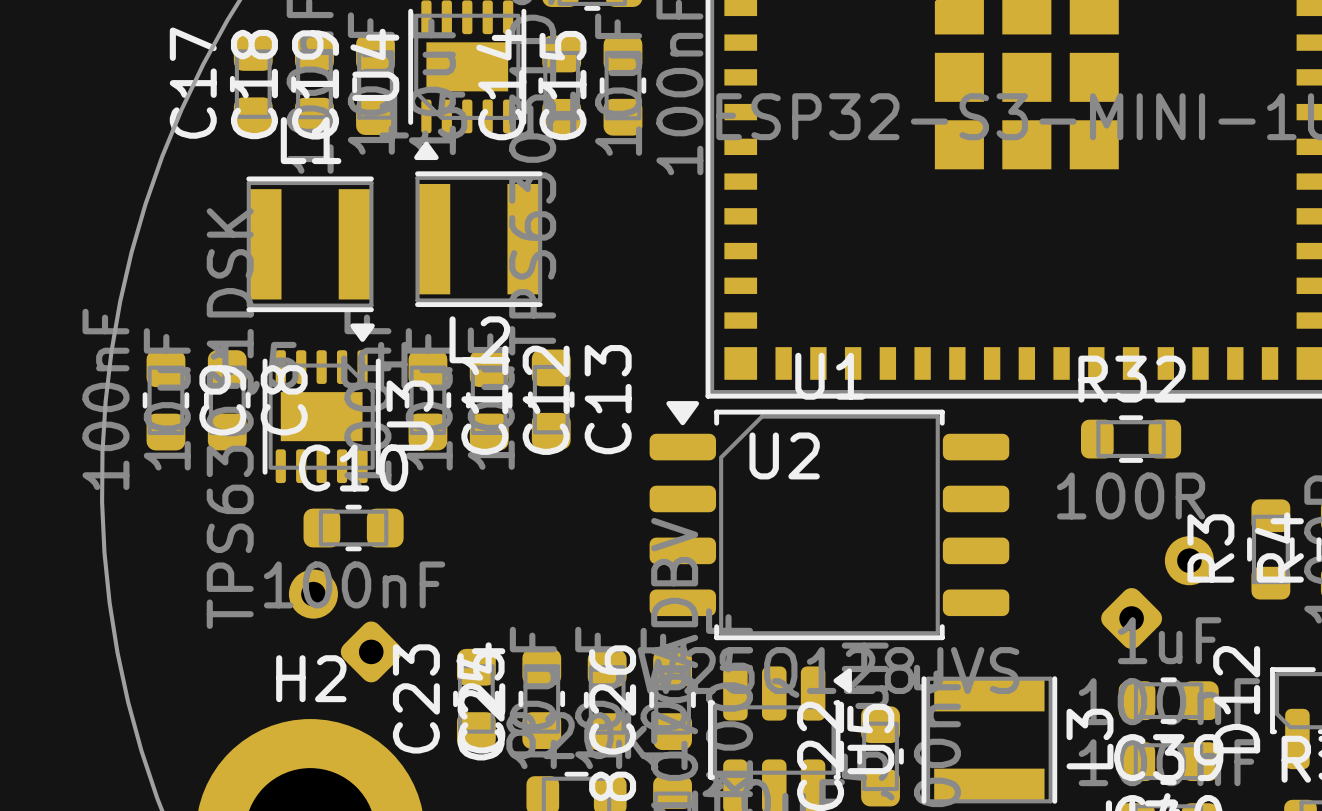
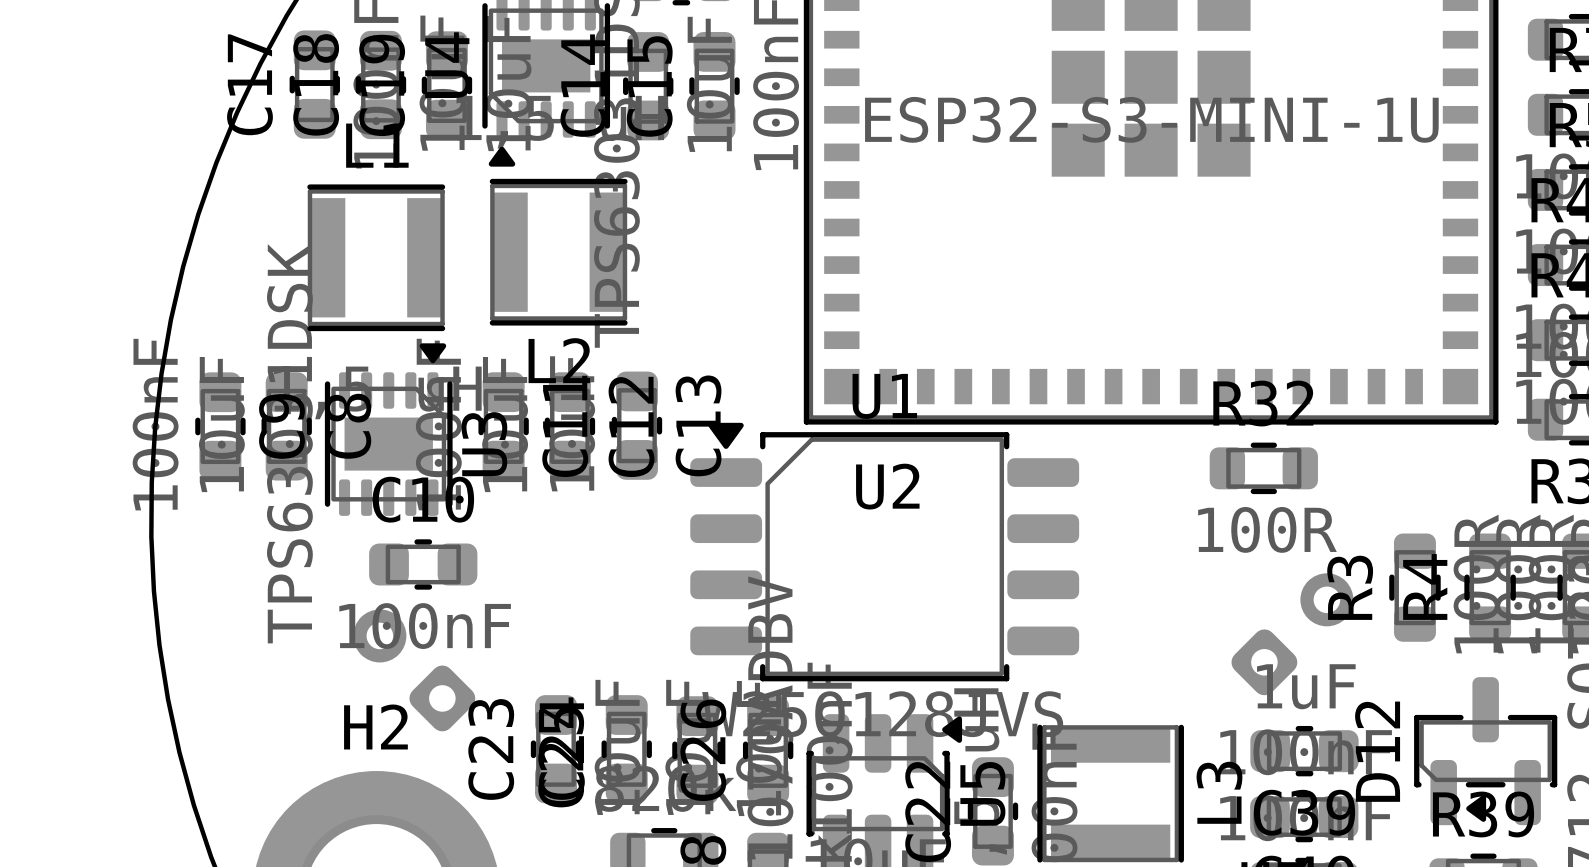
U1 position: (829, 520) -> (884, 552)

